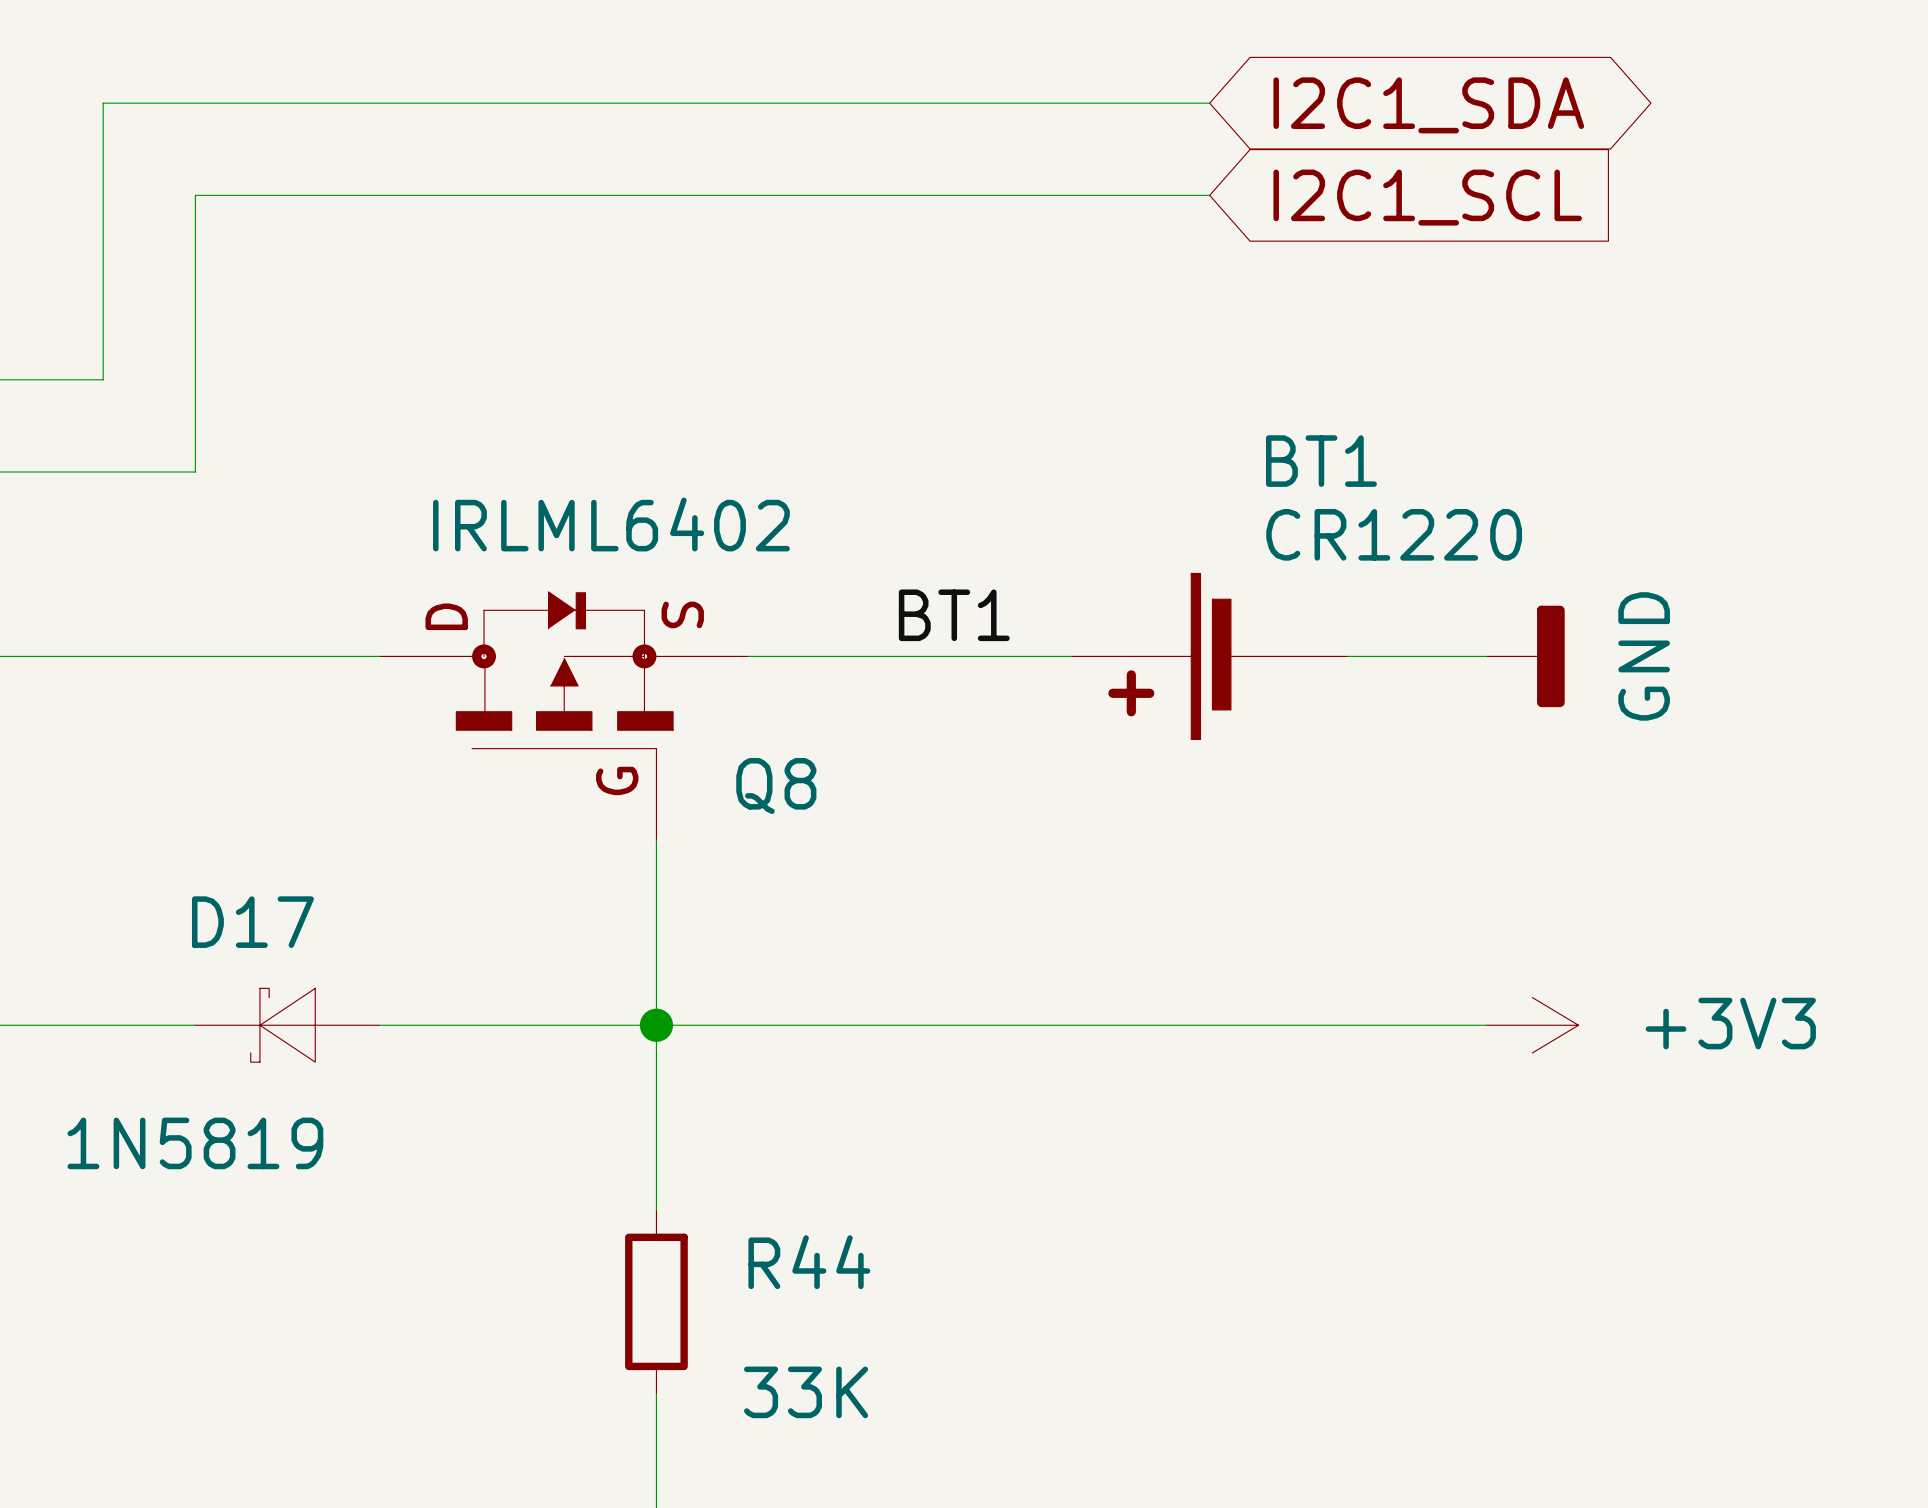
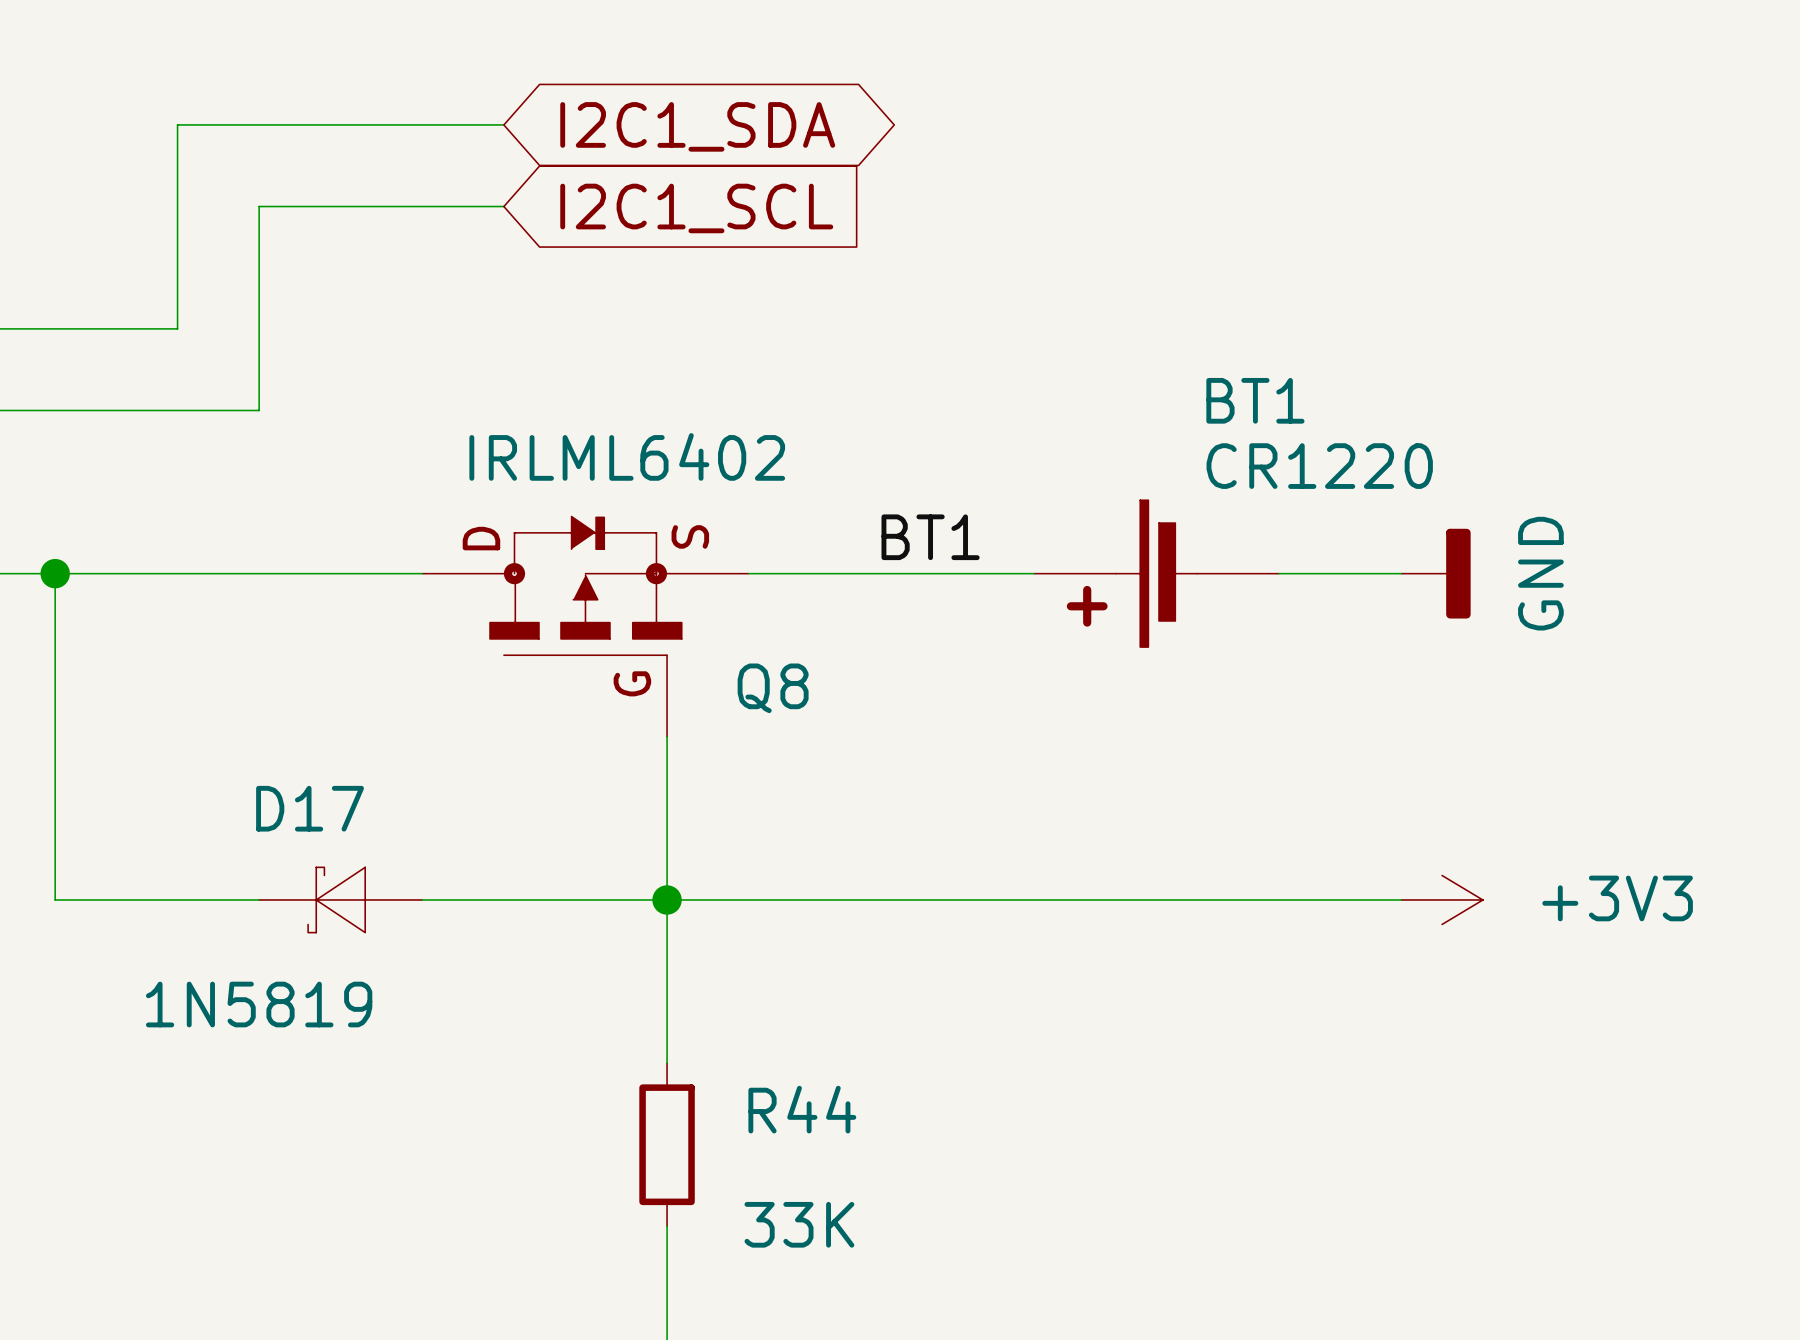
wire: (1209, 103) (103, 103) (103, 149) -> (503, 124) (177, 124)
global label position: I2C1_SDA (1428, 105) -> I2C1_SDA (697, 126)
wire: (1209, 195) (195, 195) (195, 241) -> (503, 206) (259, 206)
global label position: I2C1_SCL (1427, 197) -> I2C1_SCL (696, 208)

